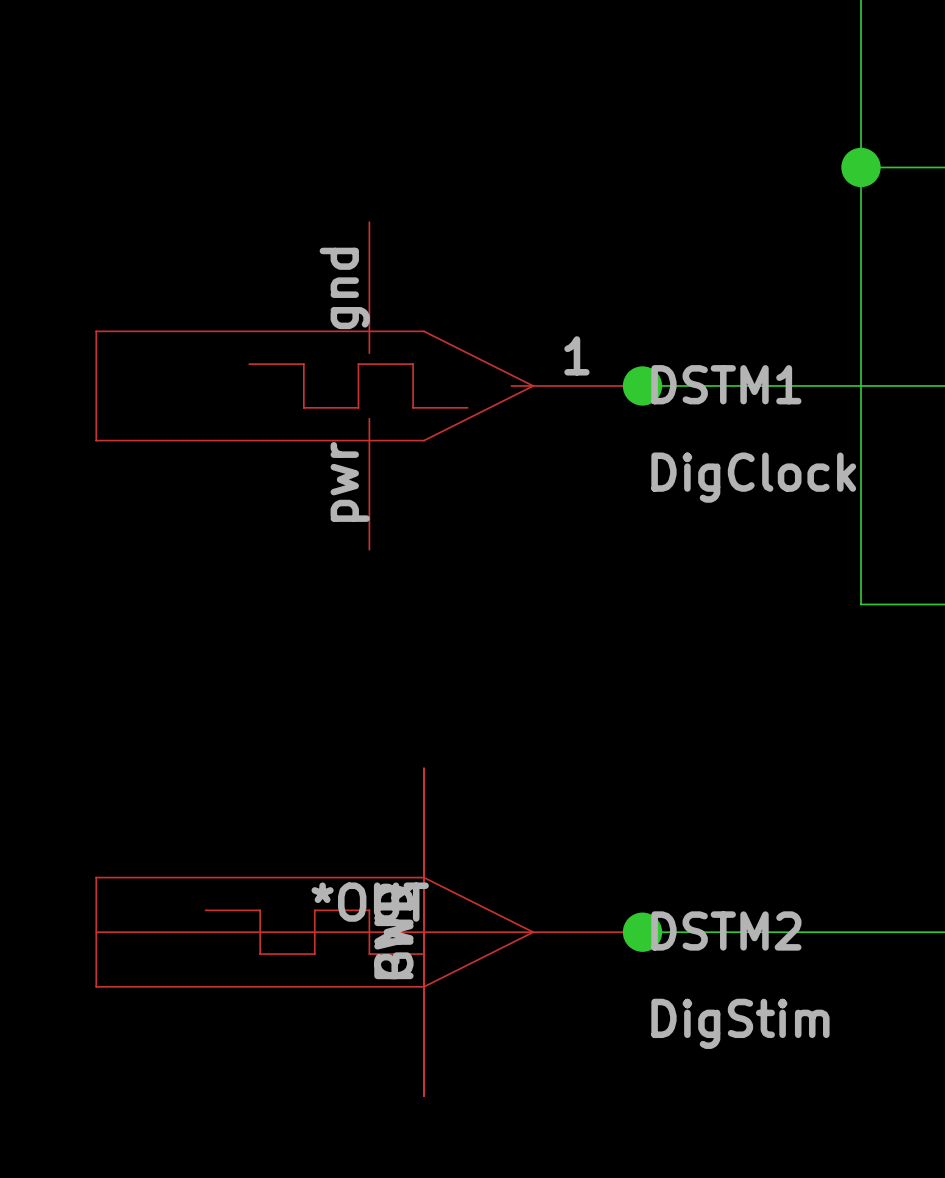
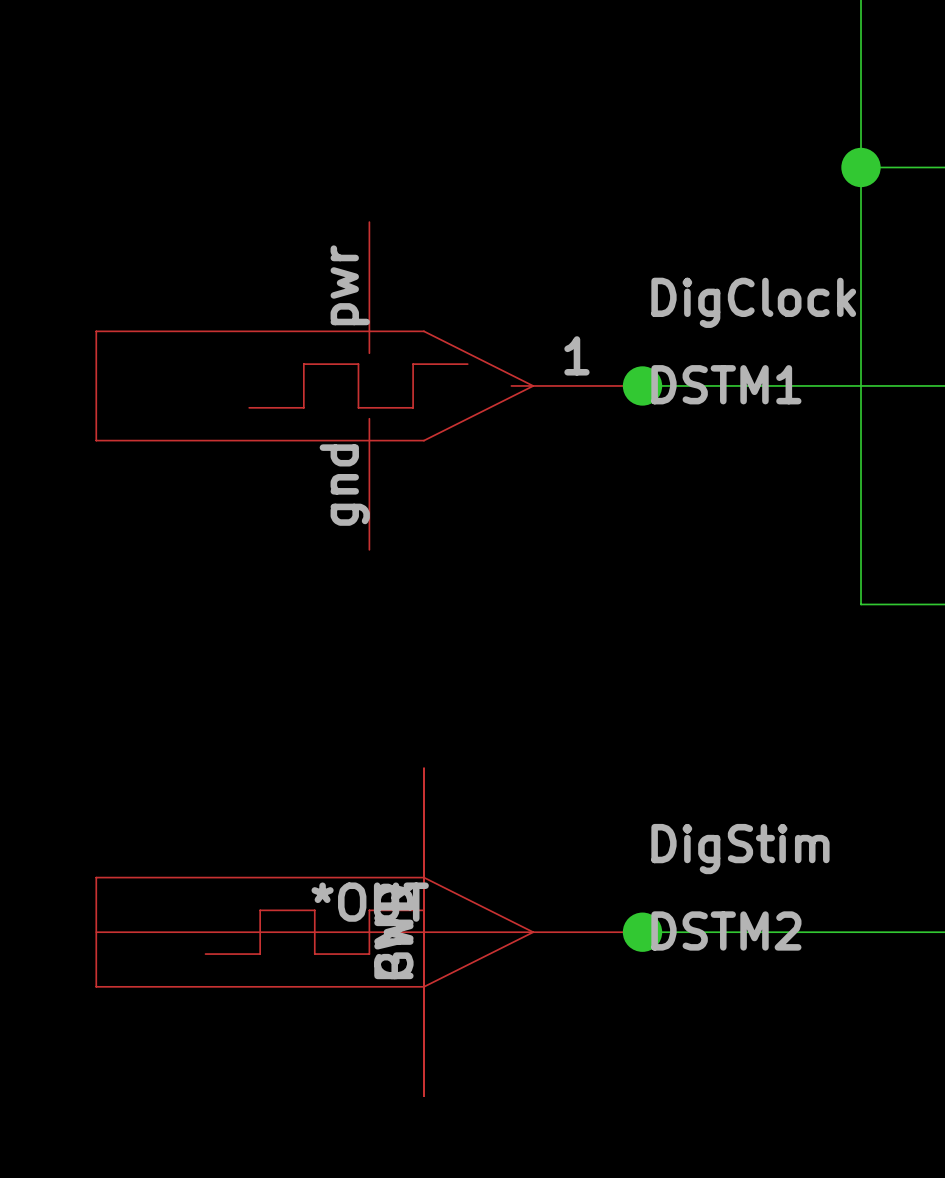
DSTM1 flip: as is (314, 385) -> up-down (314, 385)
DSTM2 flip: as is (314, 932) -> up-down (314, 932)

